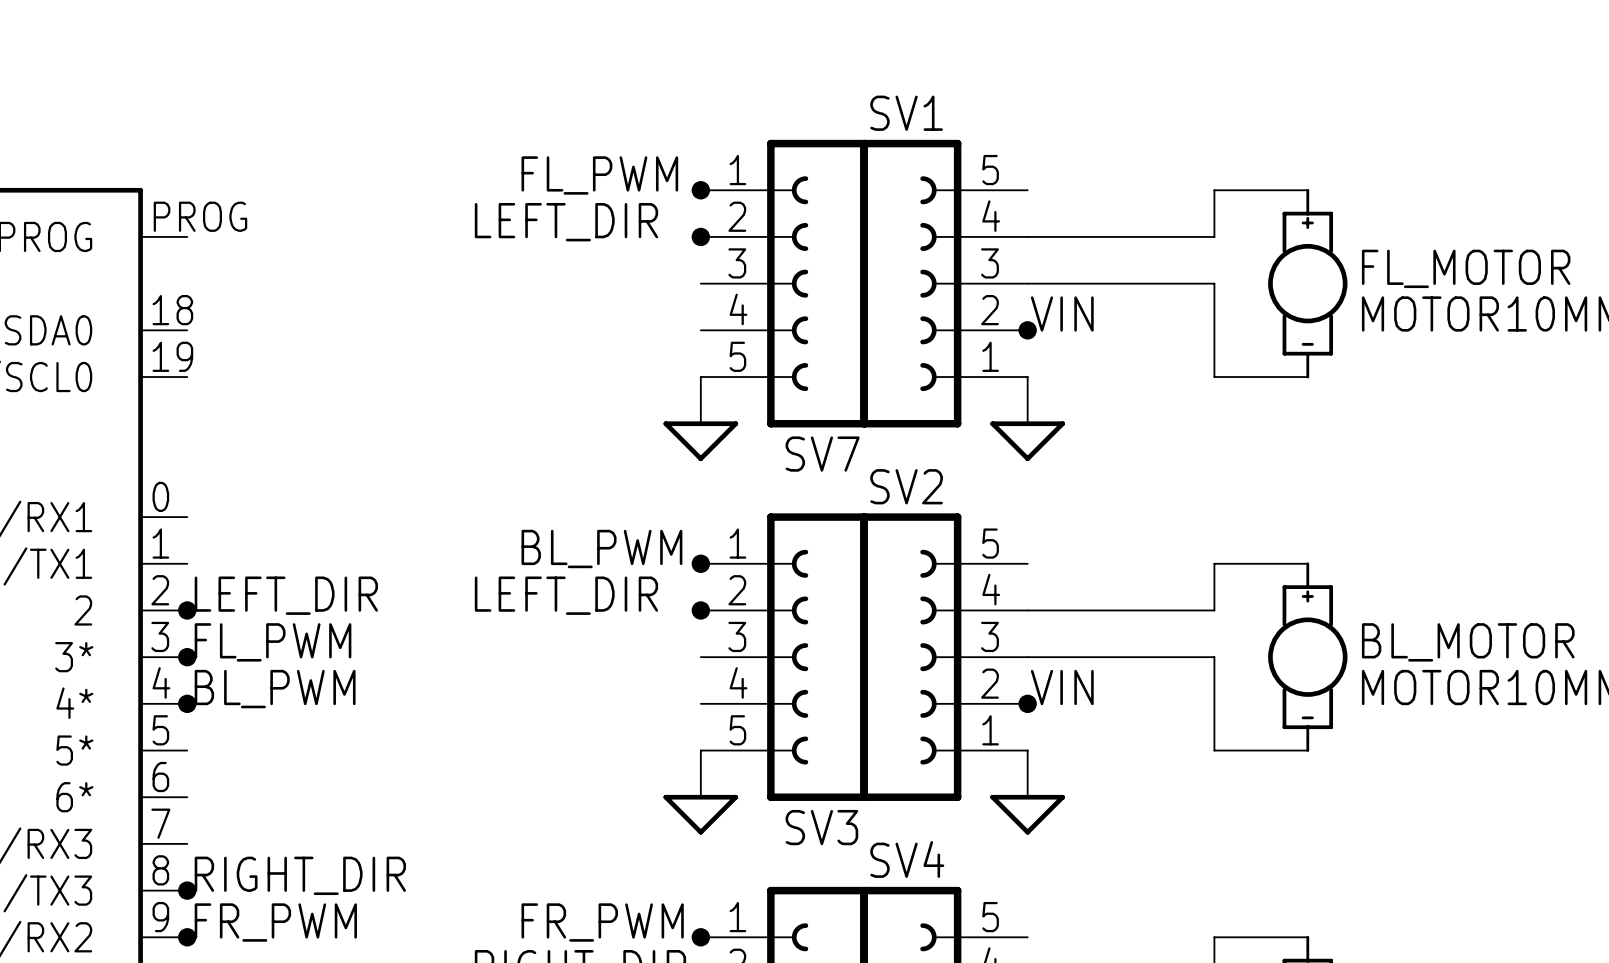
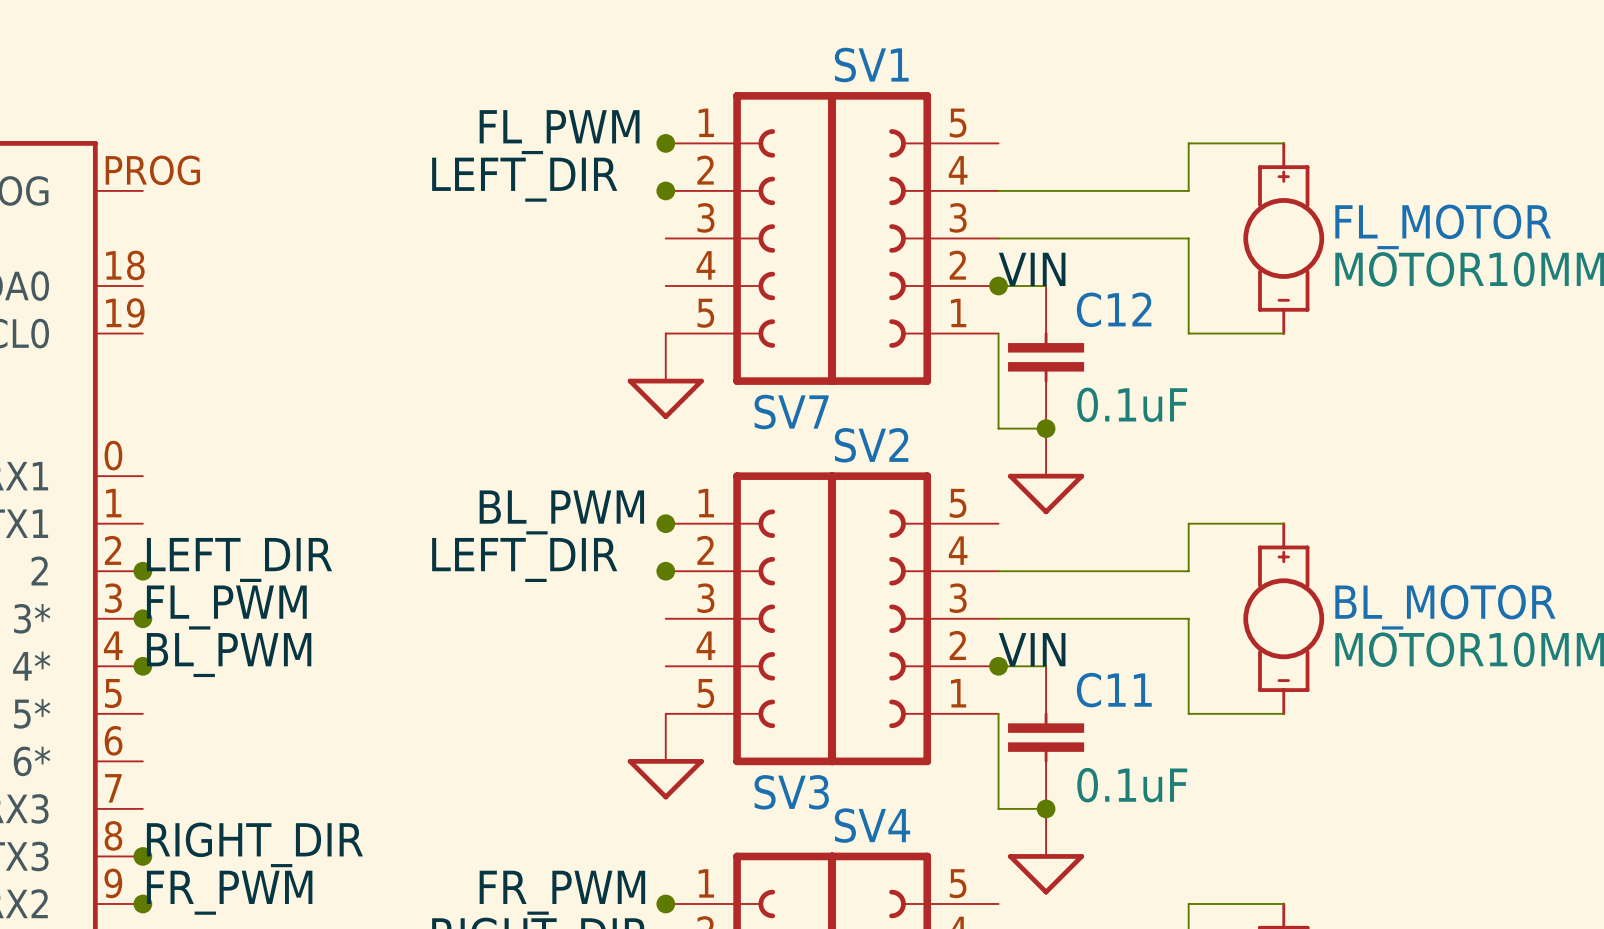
wire: none -> (998, 286) (1046, 286)
wire: none -> (998, 333) (998, 428) (1046, 428)
C12: none -> 0.1uF (1046, 357)
power symbol position: (1027, 419) -> (1046, 471)
junction: none -> (1046, 428)
wire: none -> (998, 666) (1046, 666)
wire: none -> (998, 713) (998, 808) (1046, 808)
C11: none -> 0.1uF (1046, 737)
power symbol position: (1027, 792) -> (1046, 851)
junction: none -> (1046, 808)

